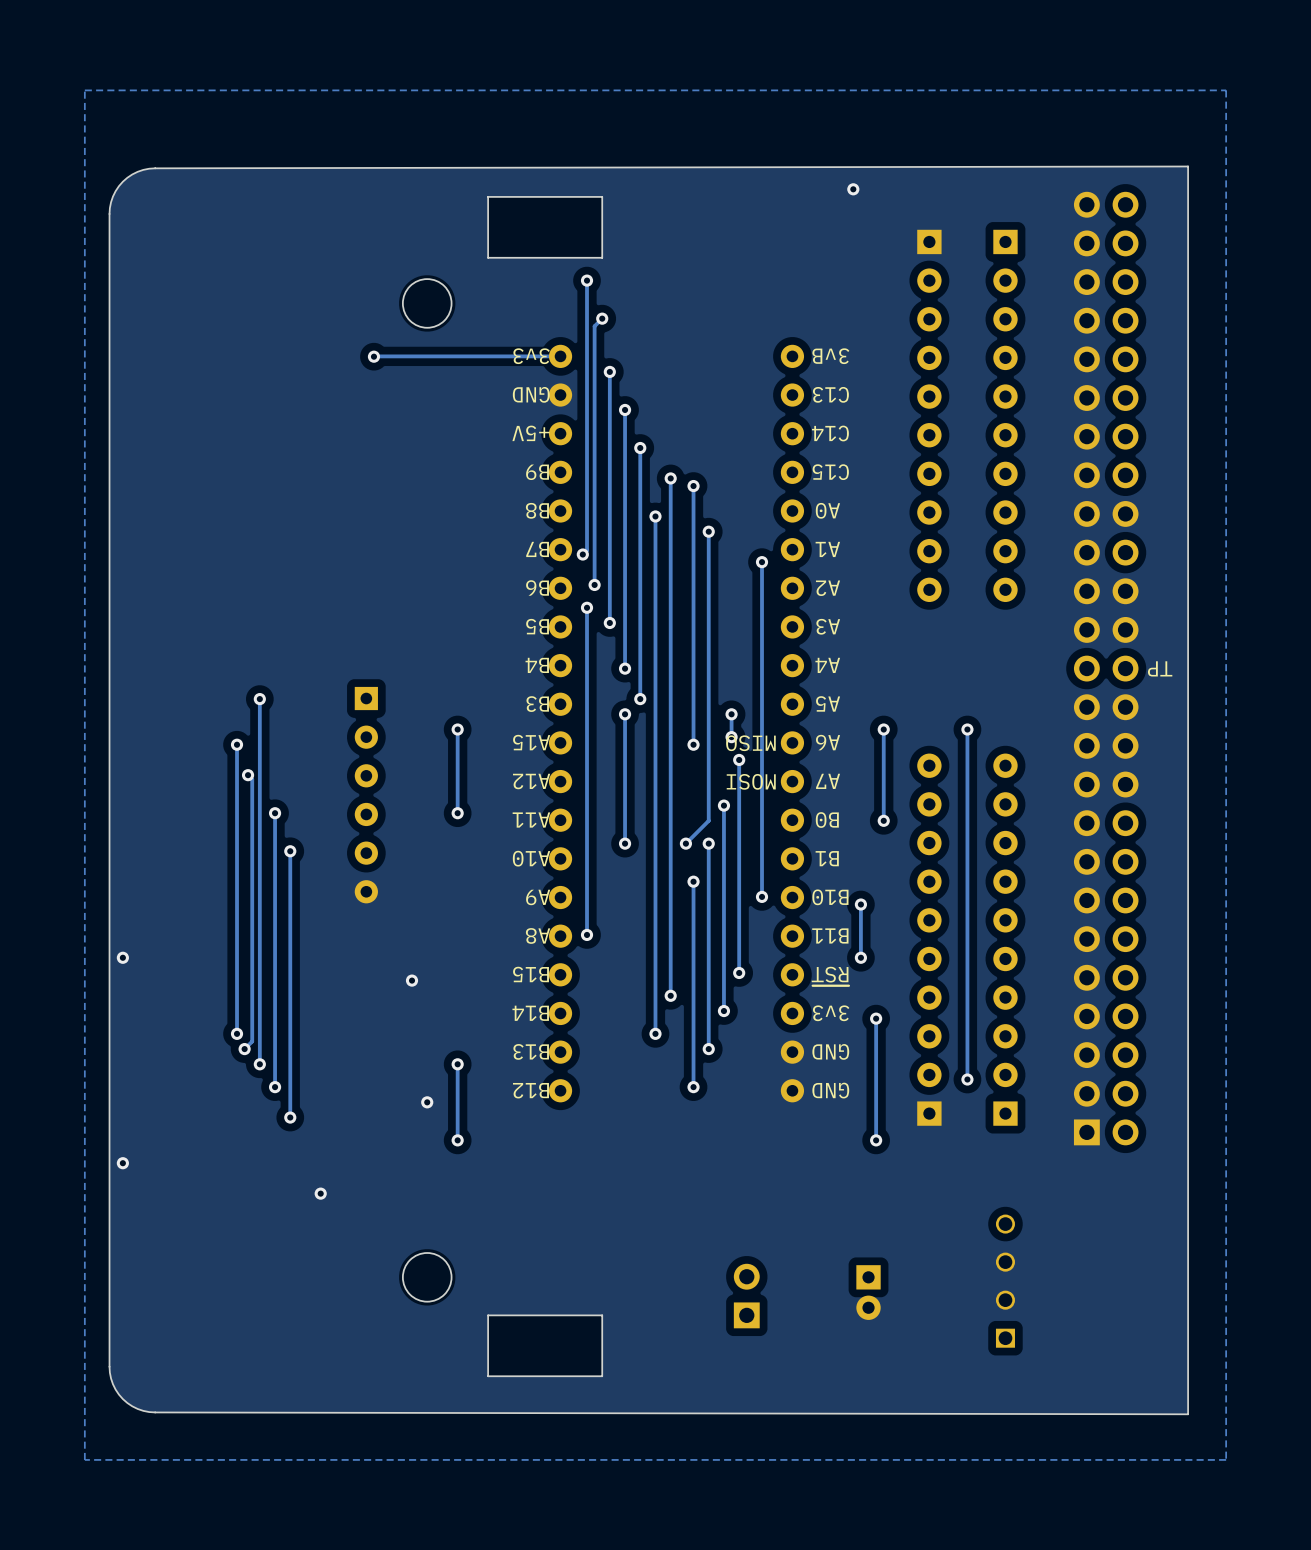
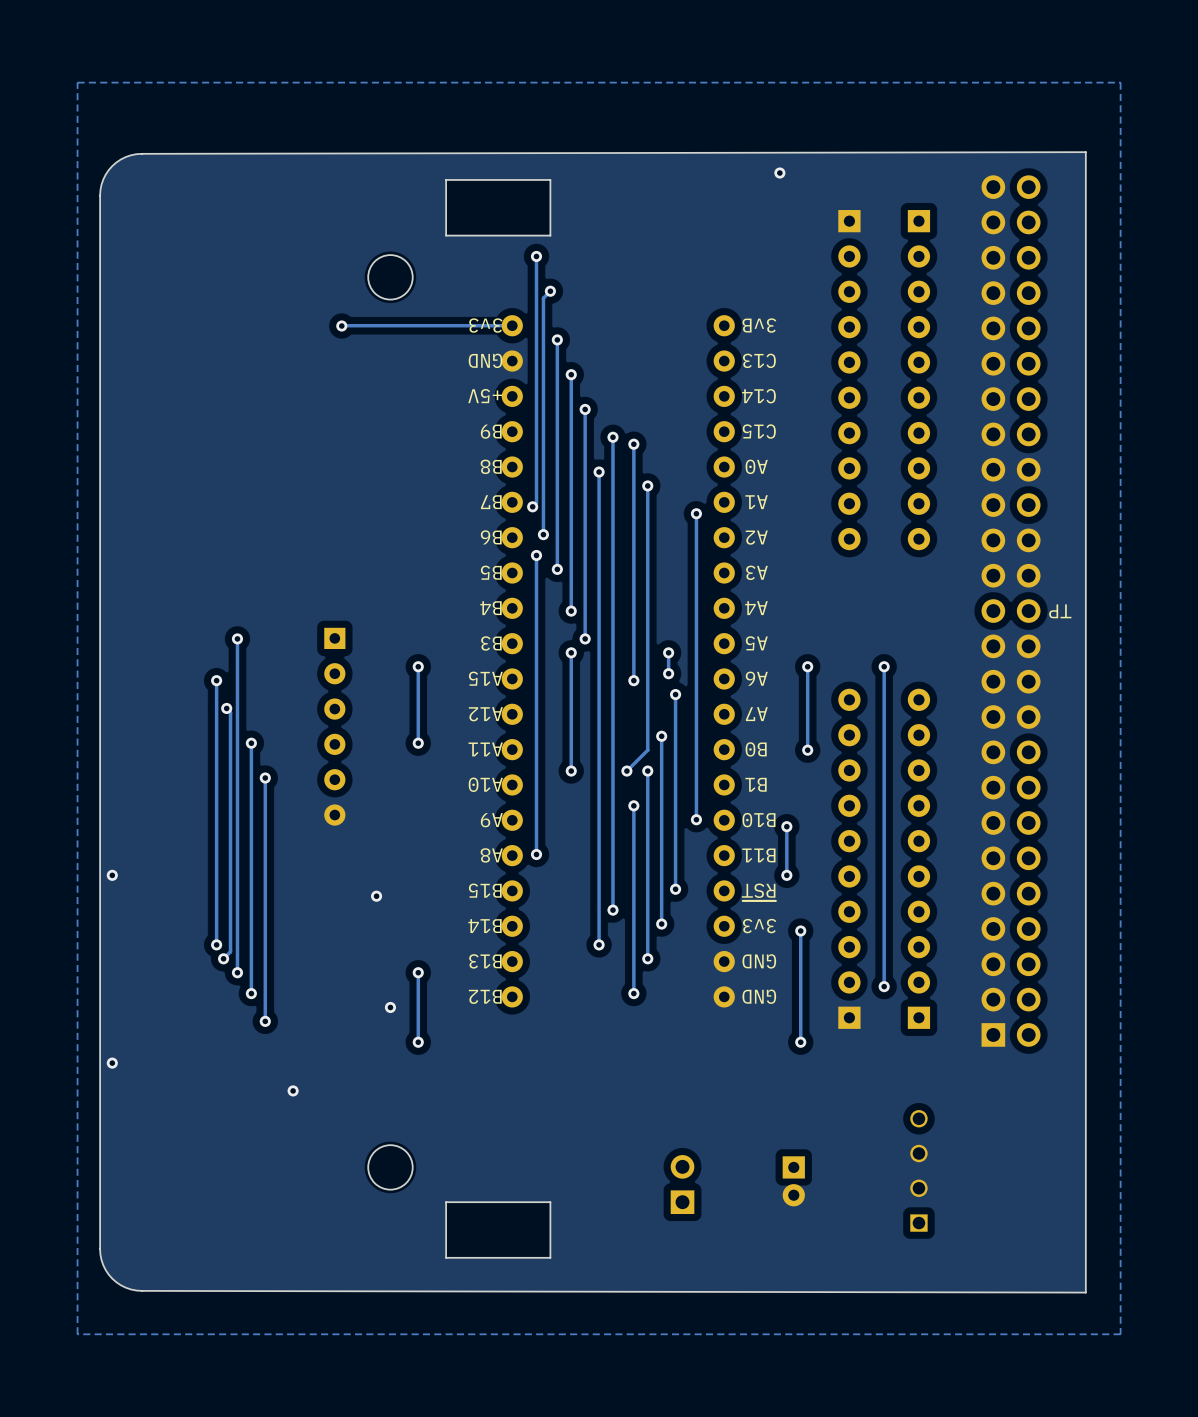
text: MISO (750, 743) -> none
text: MOSI (751, 781) -> none

